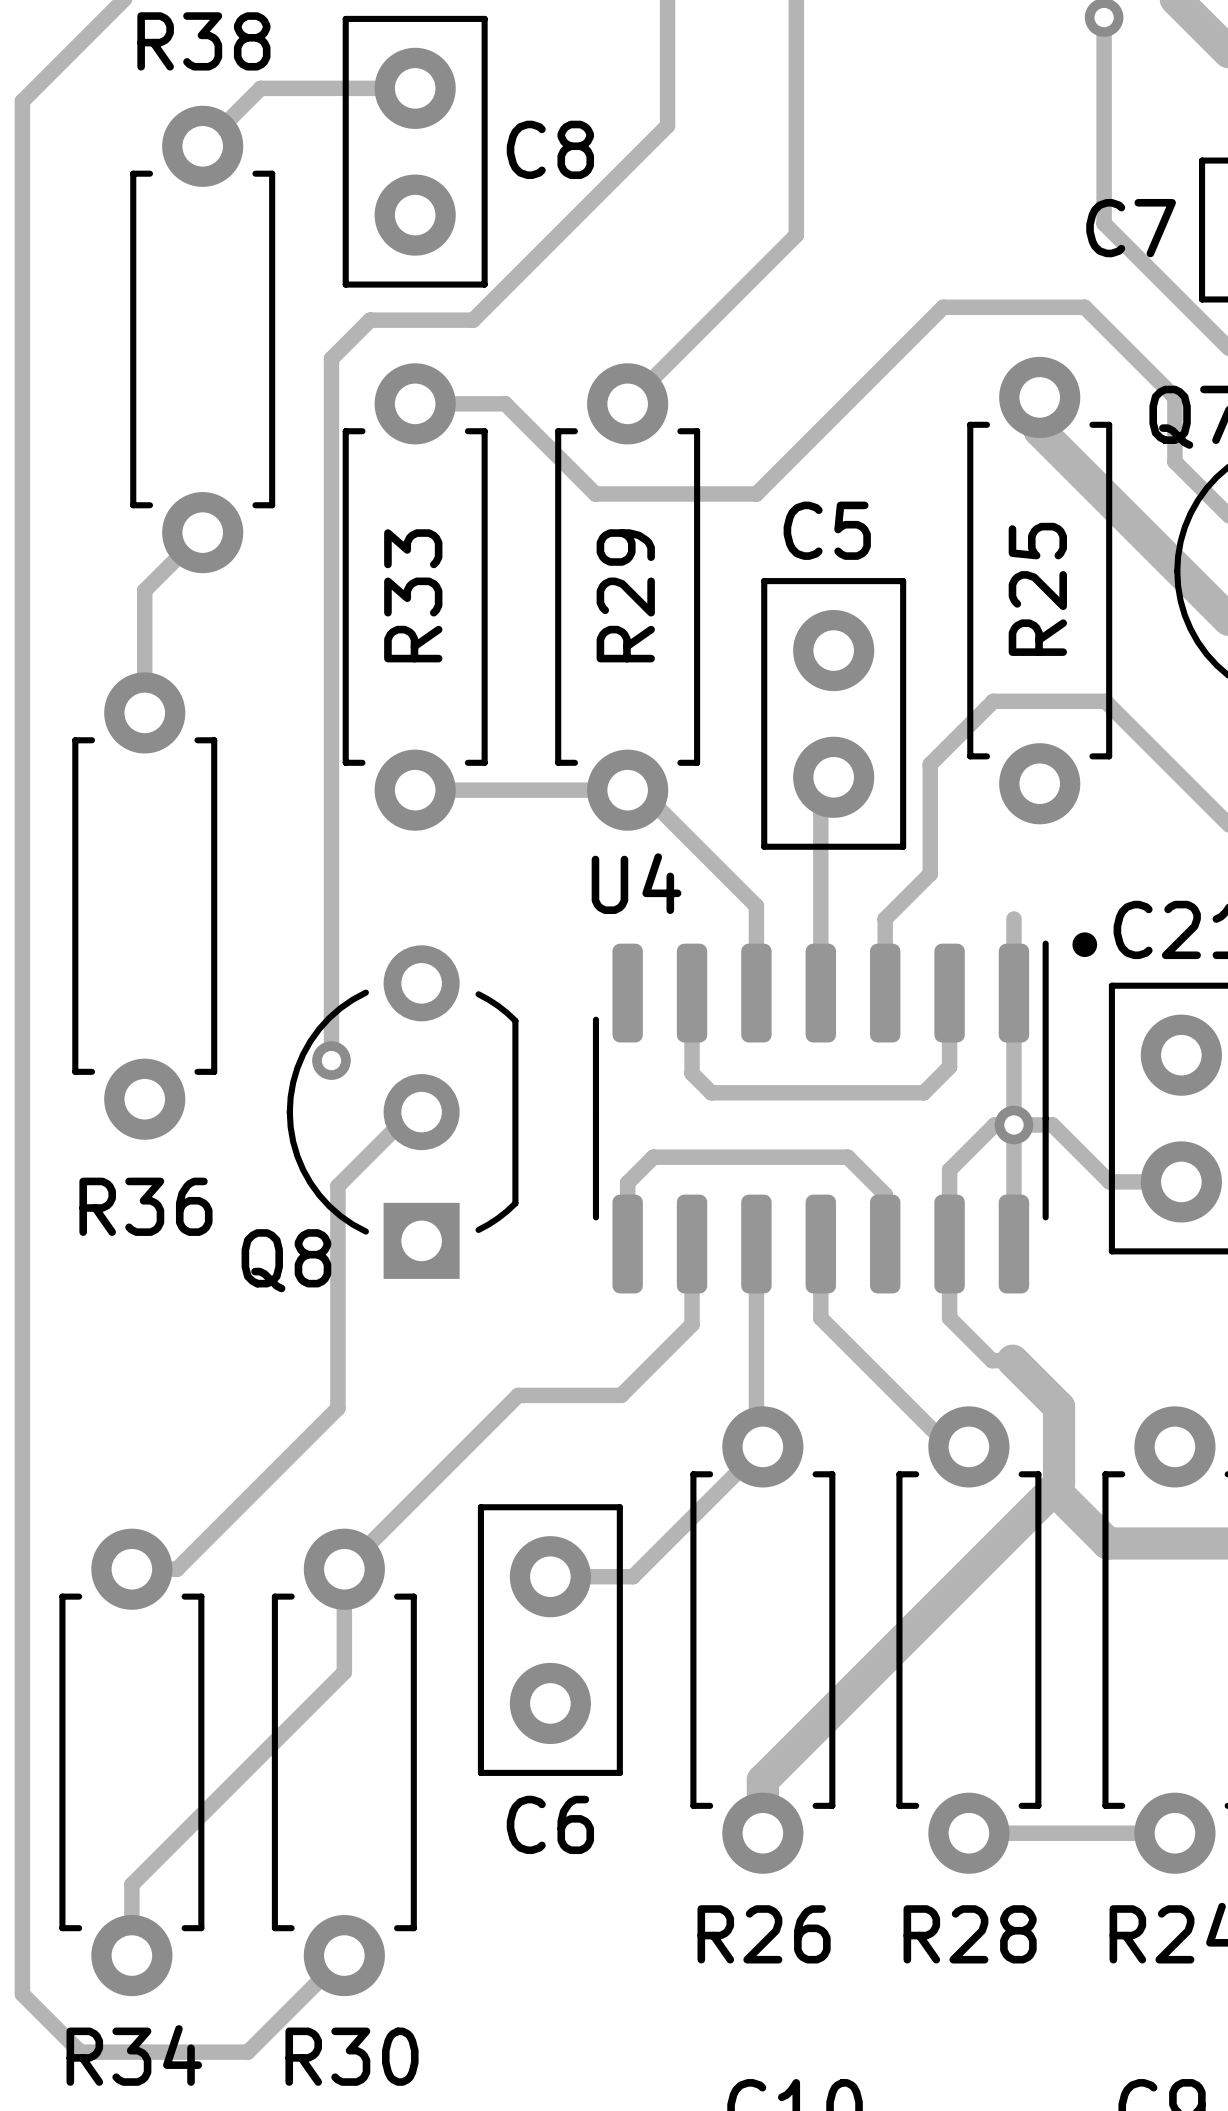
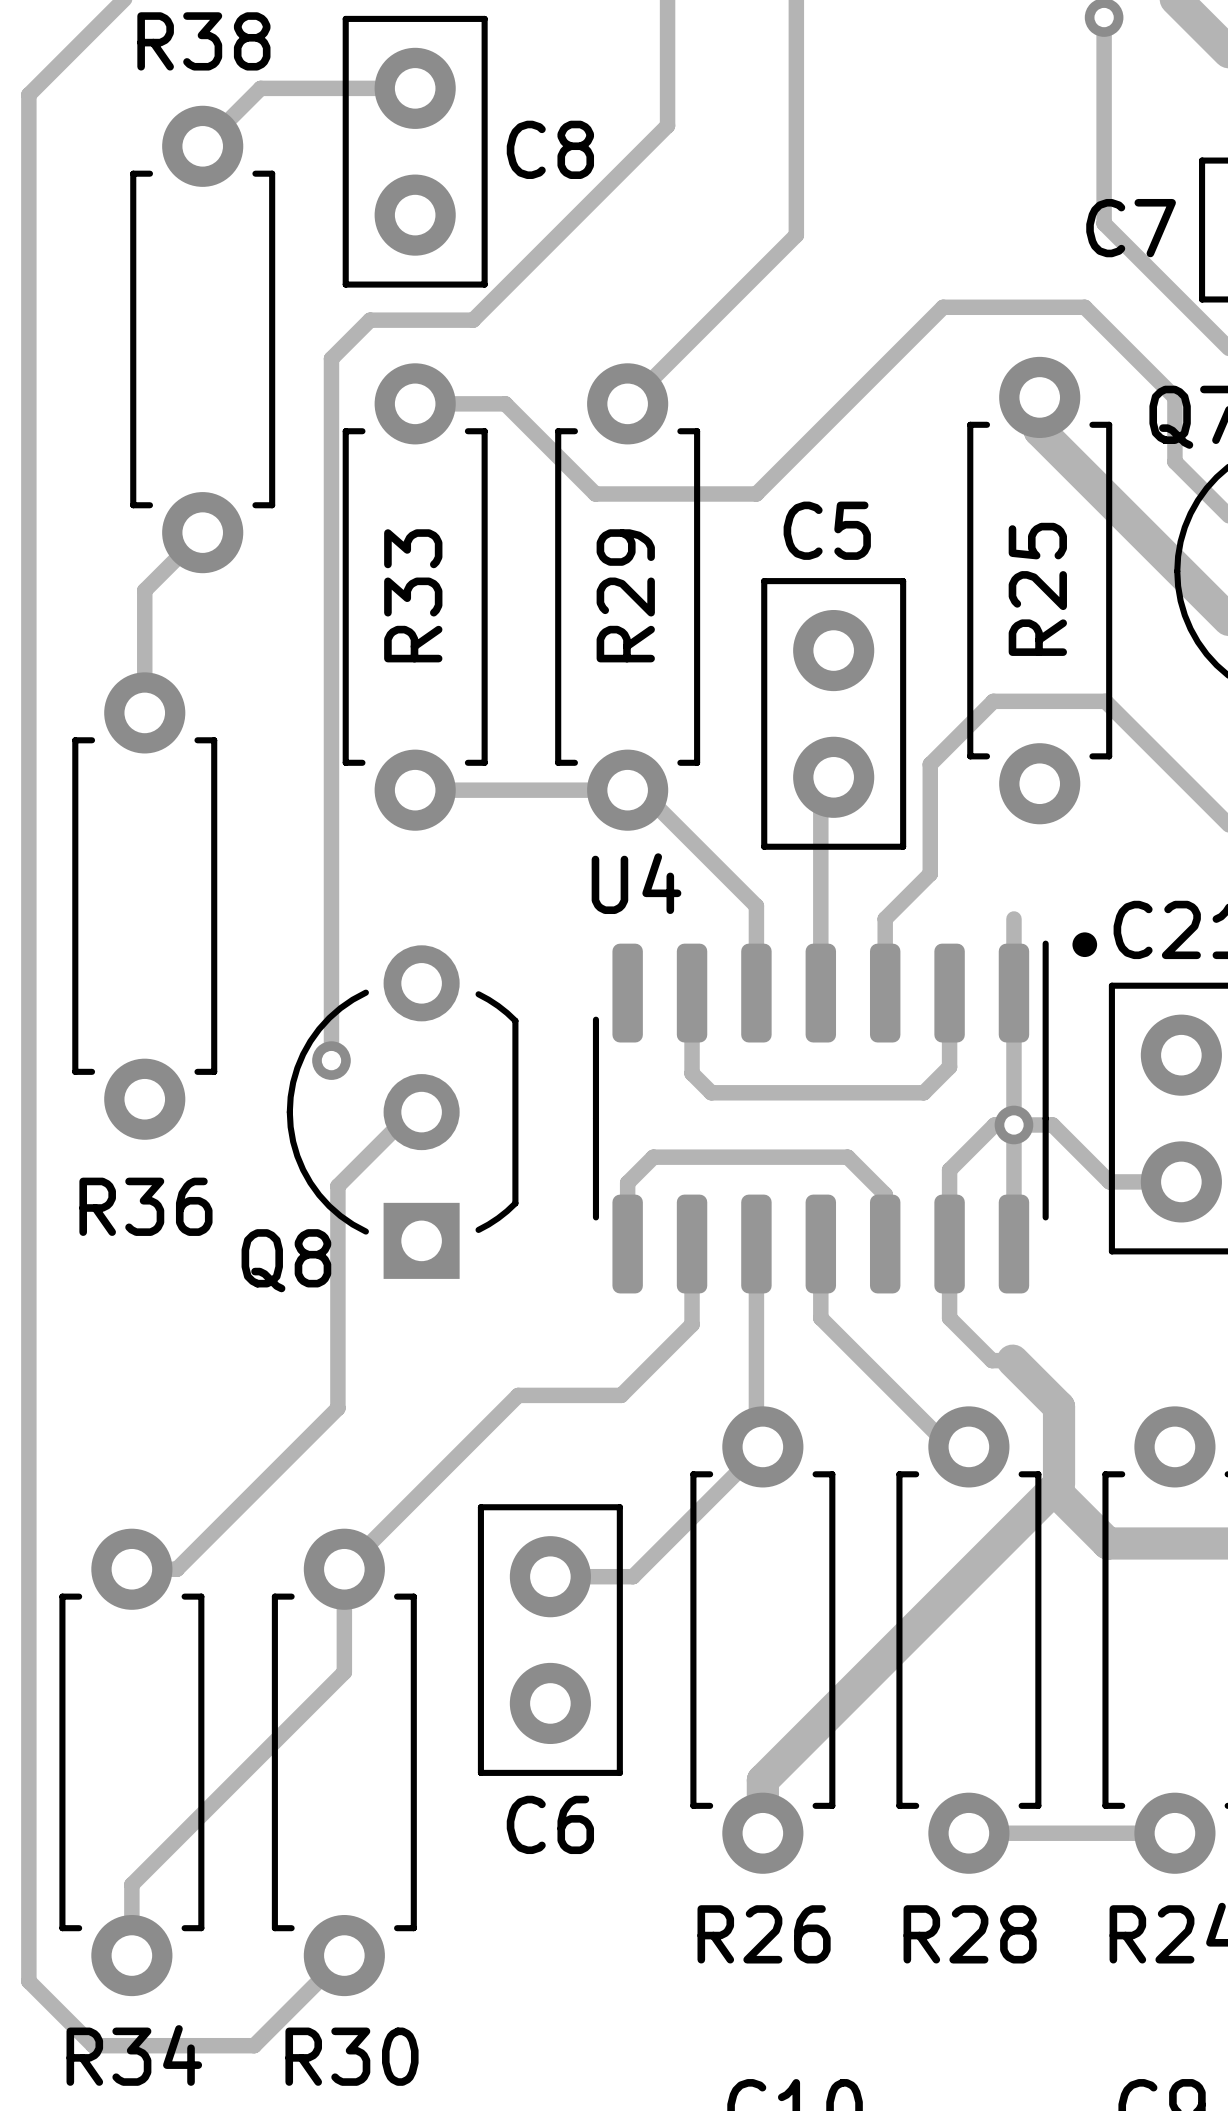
track: (28, 94) (22, 101) (22, 1994) (80, 2052) (247, 2052) (254, 2045) -> (28, 94) (28, 1981) (93, 2045) (254, 2045)

